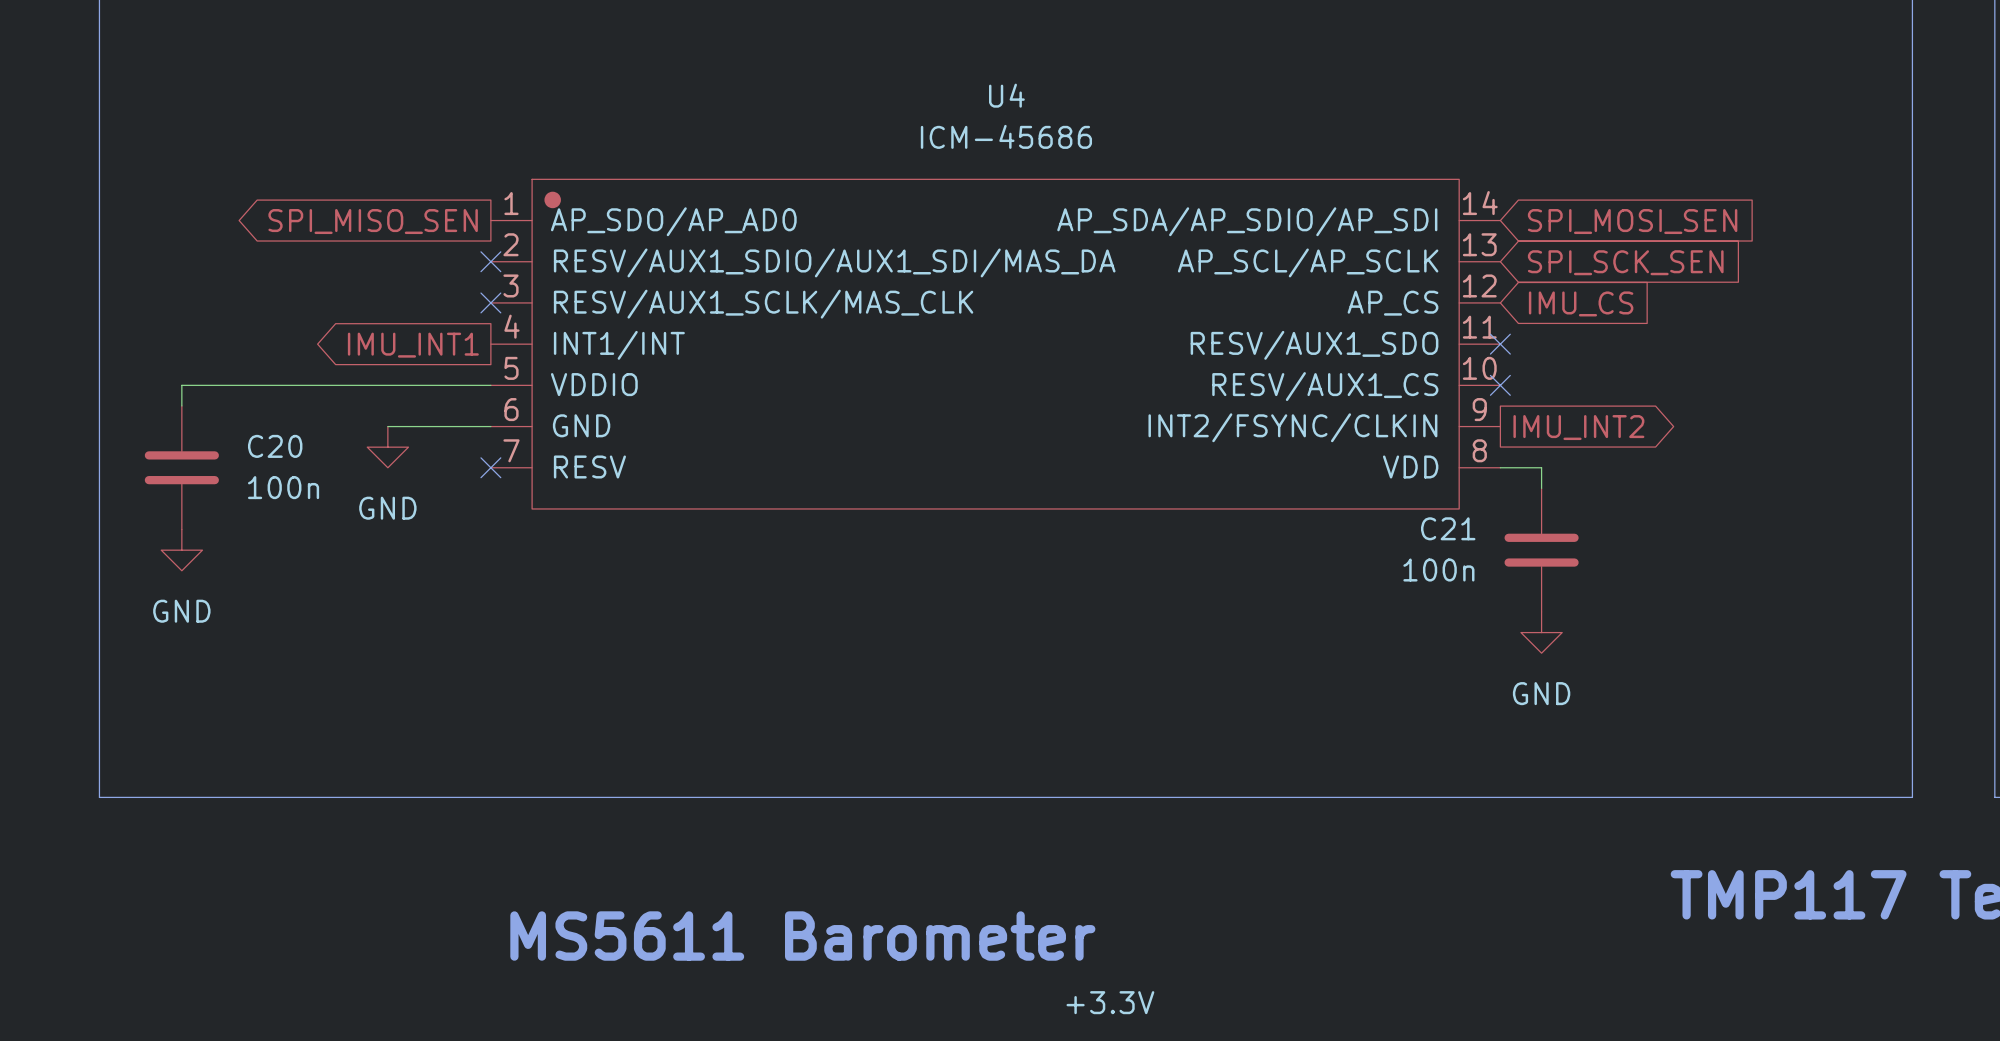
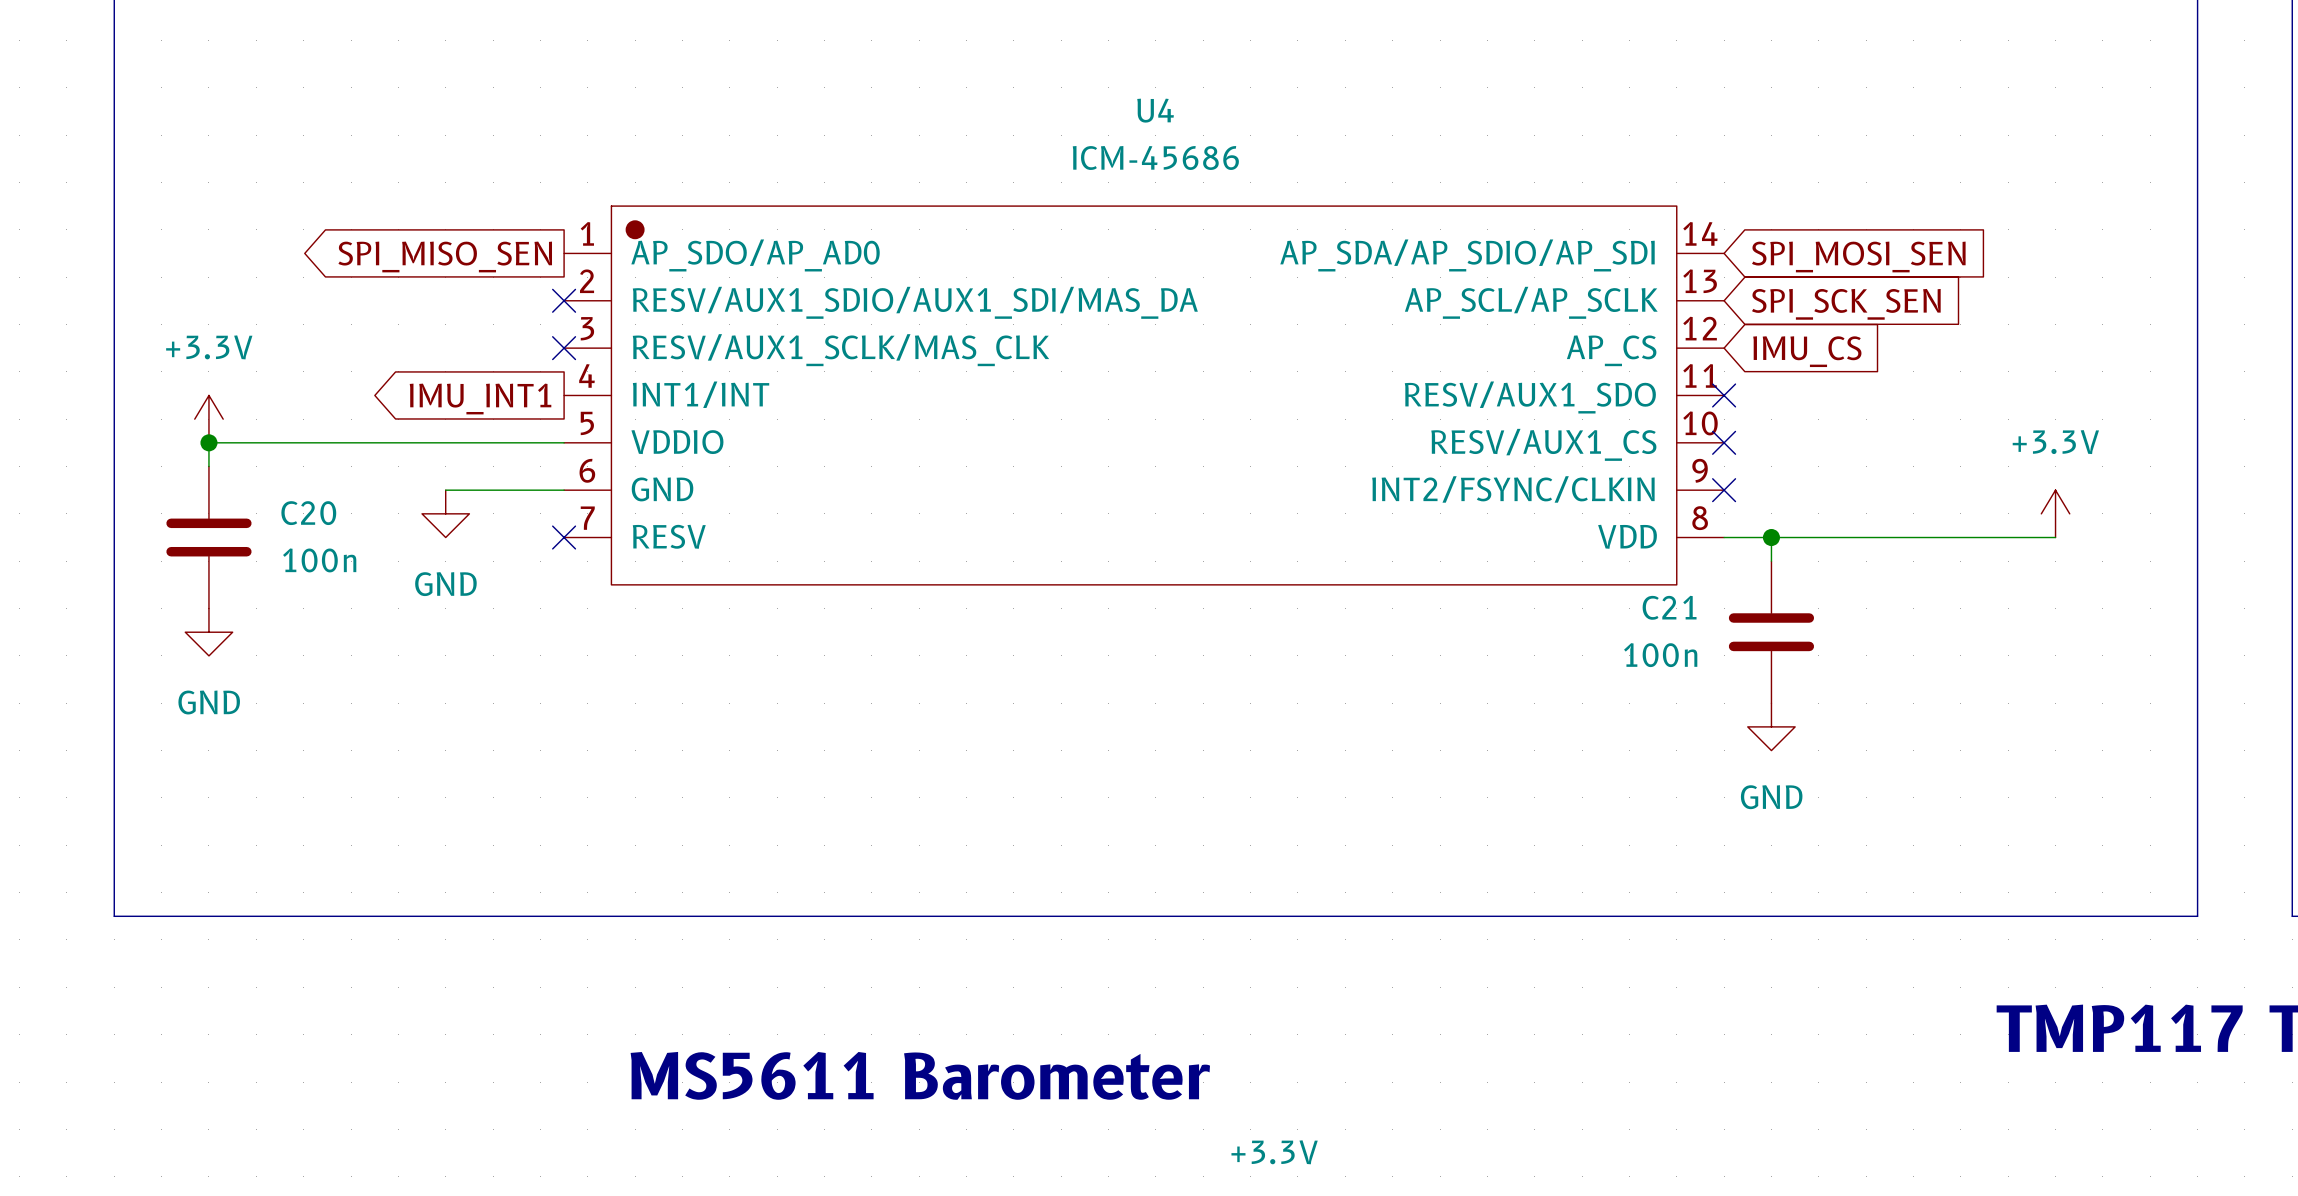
power symbol: none -> +3.3V (208, 419)
junction: none -> (208, 442)
no-connect mark: none -> (1724, 490)
global label: IMU_INT2 (1578, 427) -> none
power symbol: none -> +3.3V (2055, 513)
wire: none -> (1771, 537) (2055, 537)
junction: none -> (1771, 537)

